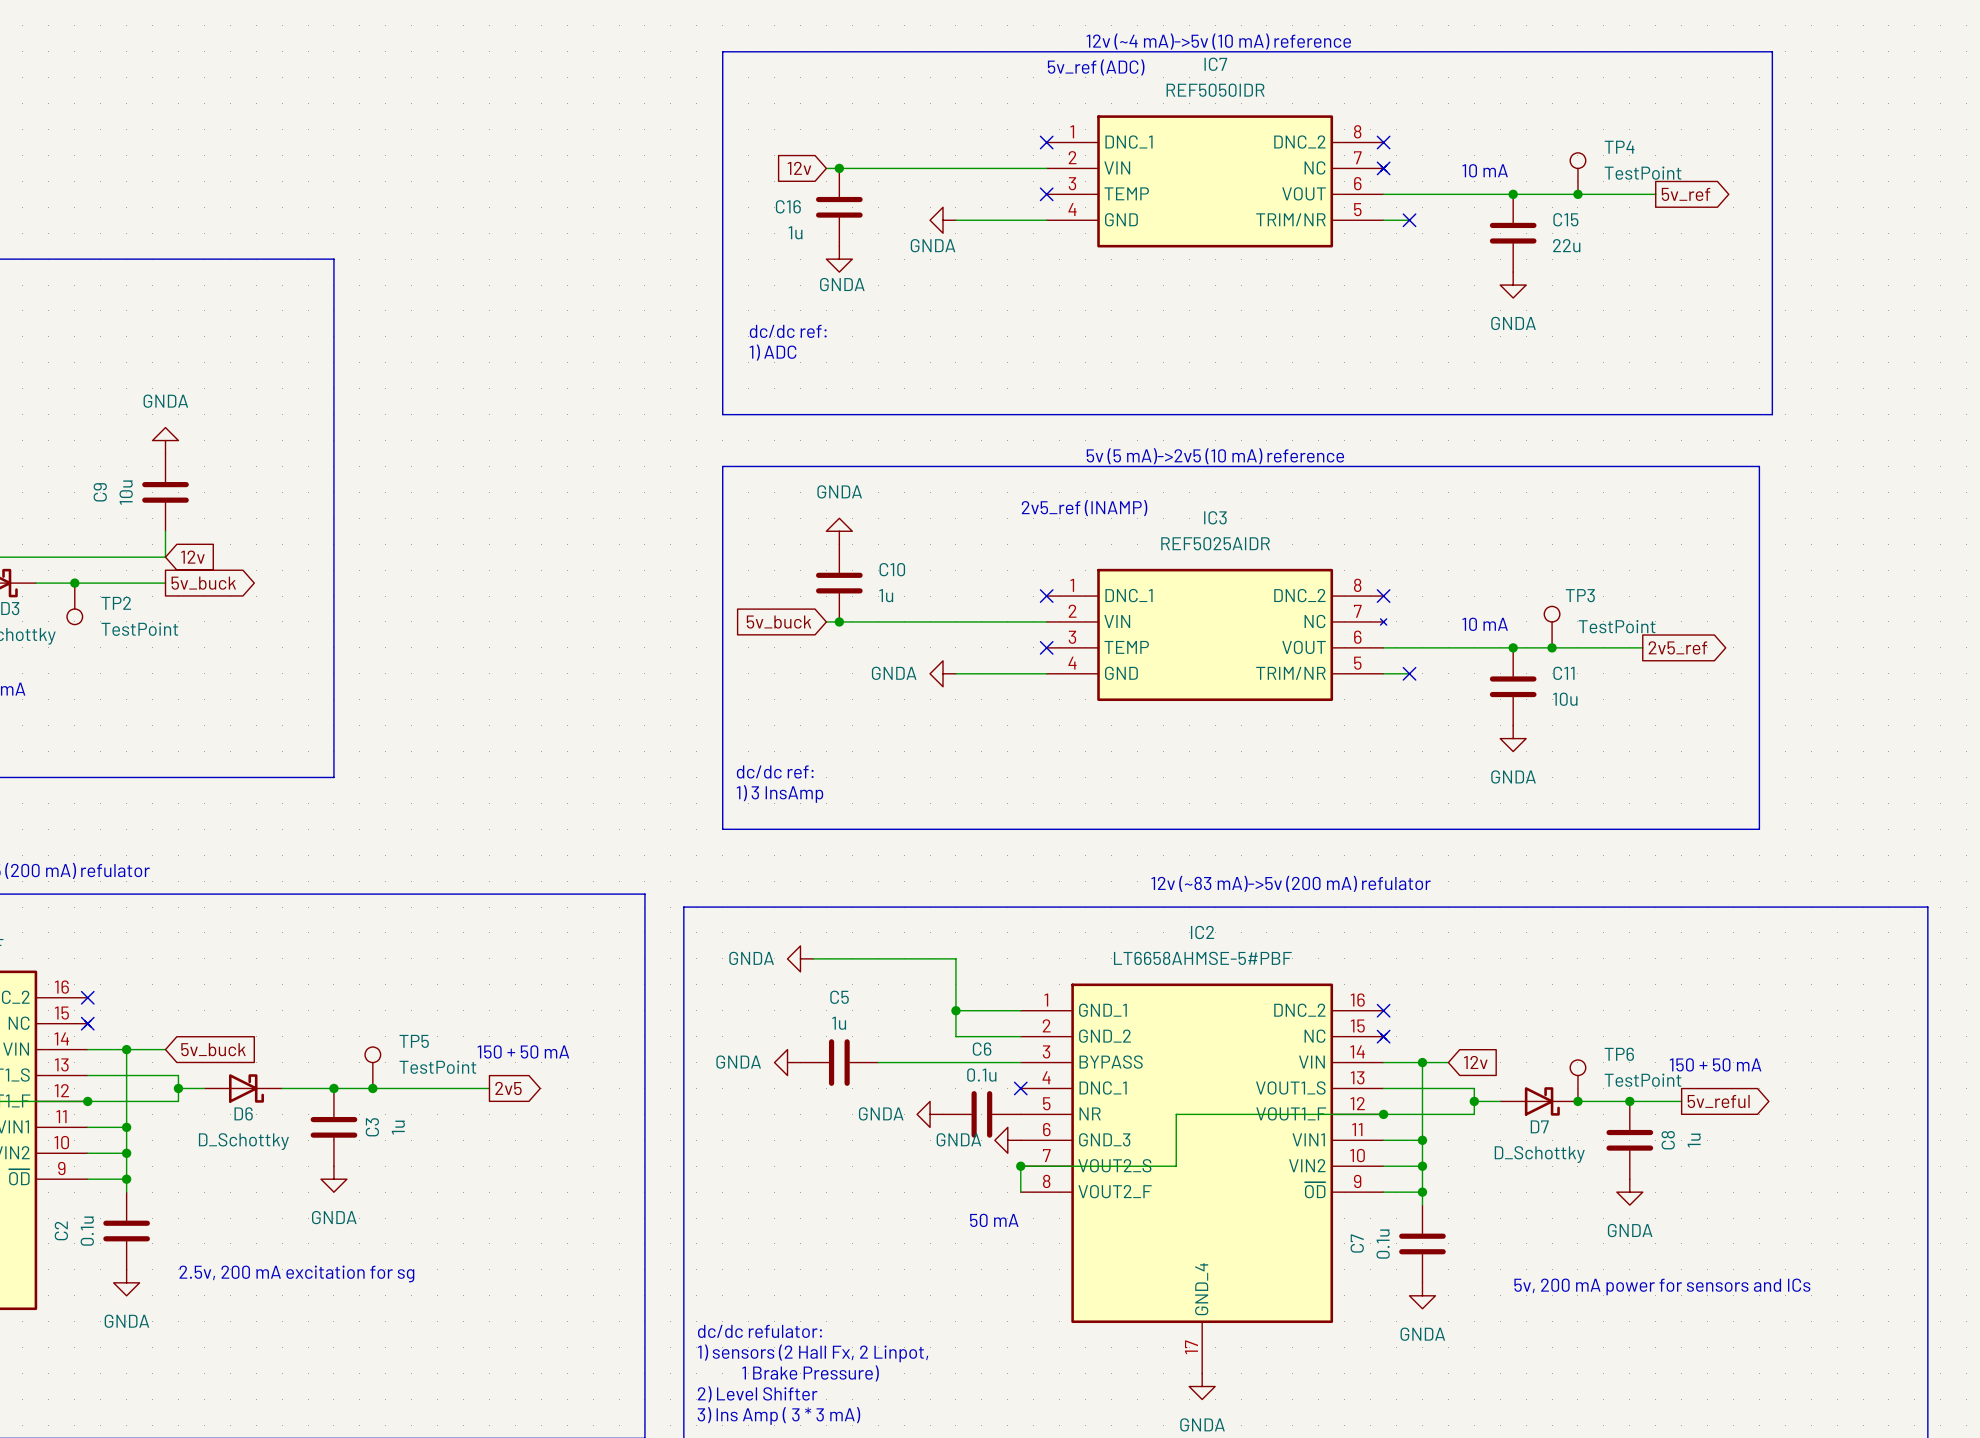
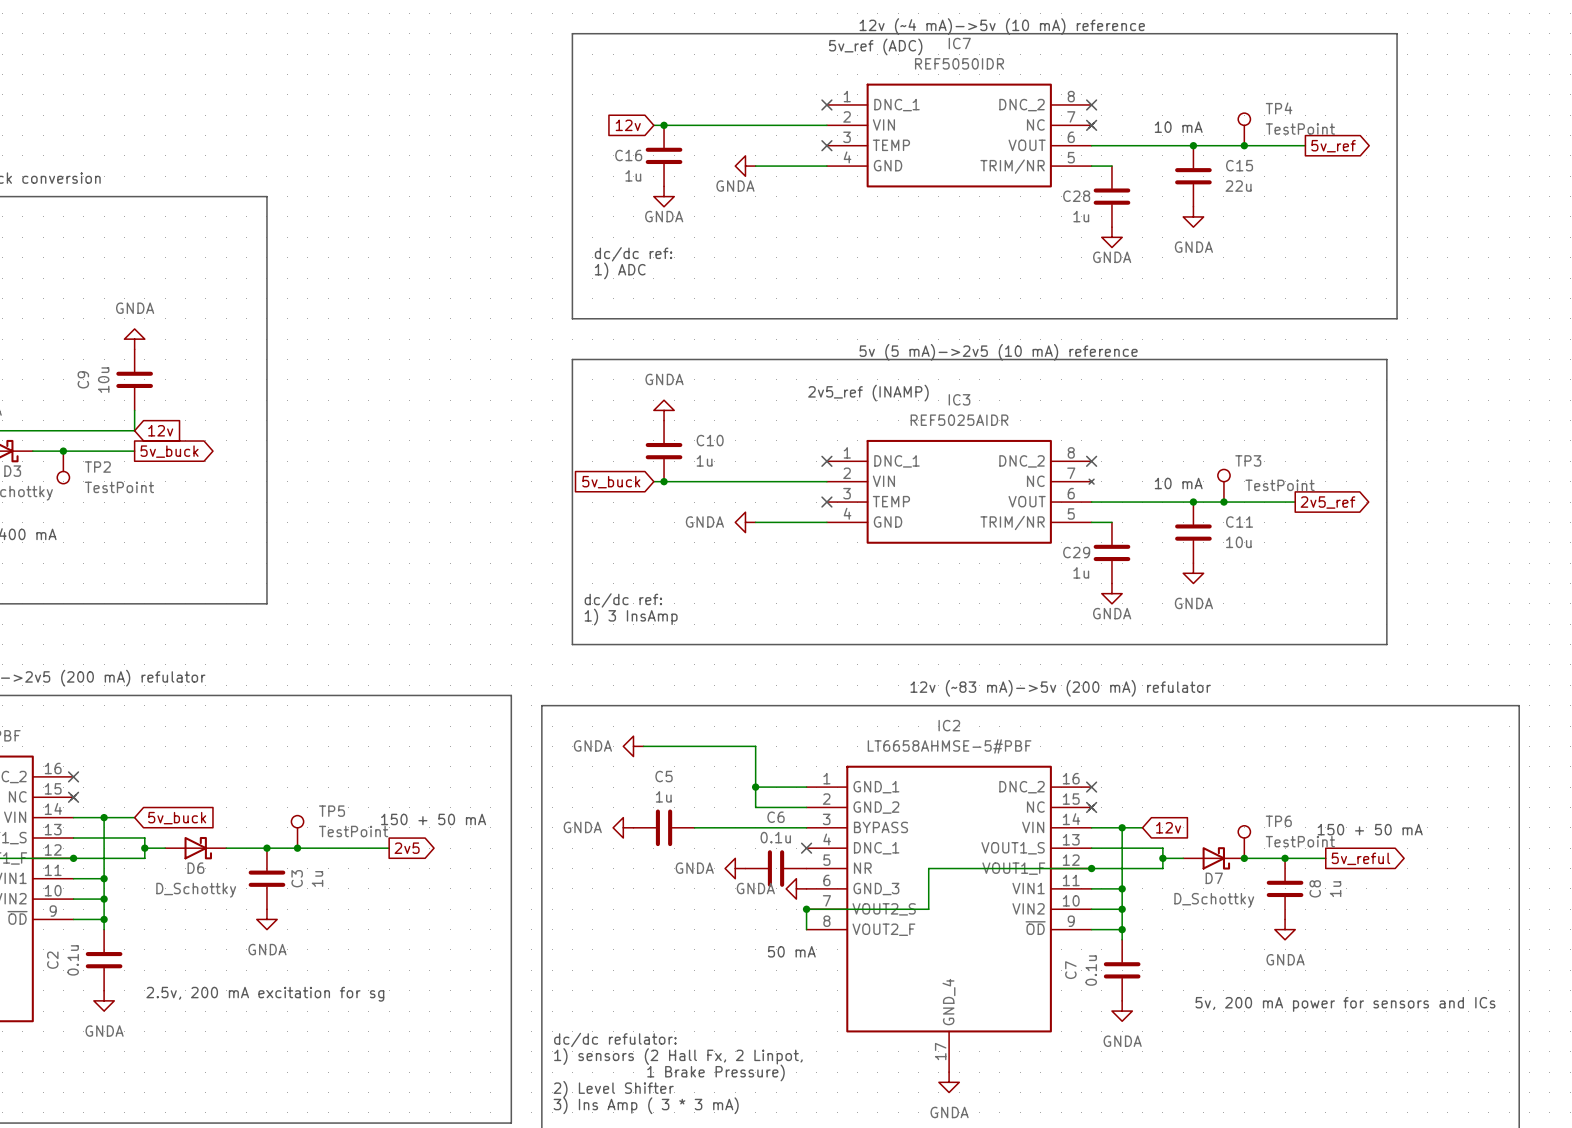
no-connect mark: (1409, 220) -> none
C28: none -> 1u (1111, 196)
power symbol: none -> GNDA (1111, 237)
no-connect mark: (1409, 673) -> none
C29: none -> 1u (1111, 552)
power symbol: none -> GNDA (1111, 593)

